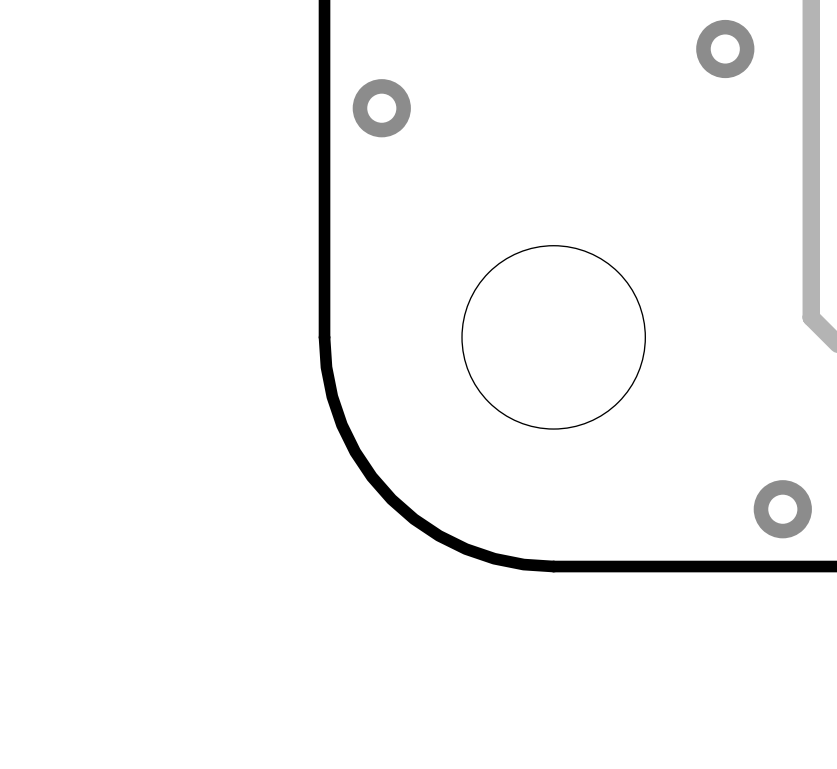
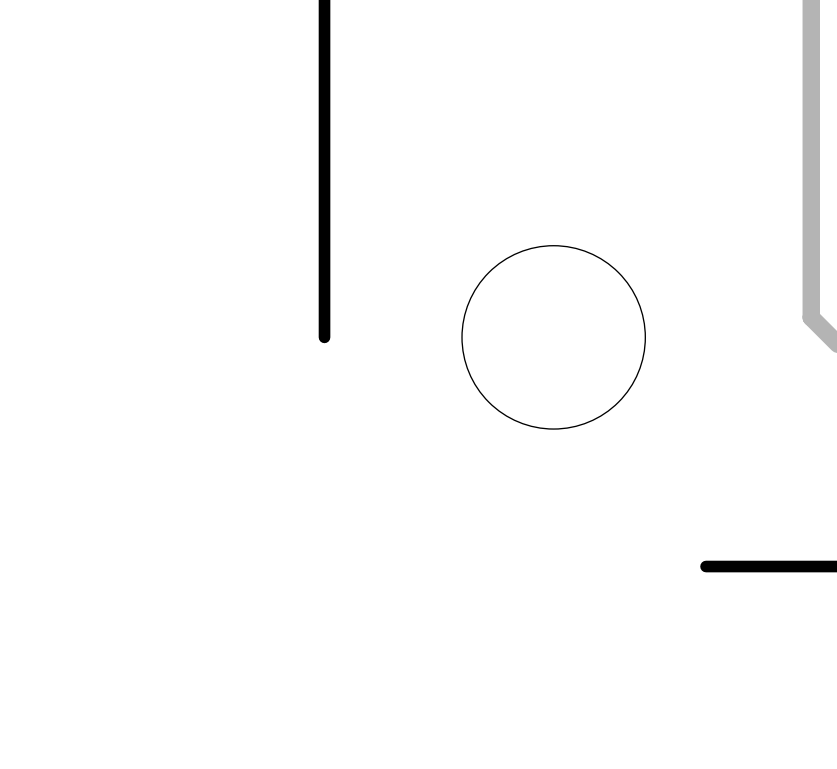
via: (725, 49) -> none
via: (381, 108) -> none
via: (782, 509) -> none
board edge: (553, 566) (523, 564) (494, 558) (465, 549) (439, 535) (414, 519) (391, 499) (371, 476) (355, 451) (341, 425) (332, 396) (326, 367) (324, 337) (326, 367) (332, 396) (341, 425) (355, 451) (371, 476) (391, 499) (414, 519) (439, 535) (465, 549) (494, 558) (523, 564) (553, 566) -> none
board edge: (706, 566) (553, 566) -> none

